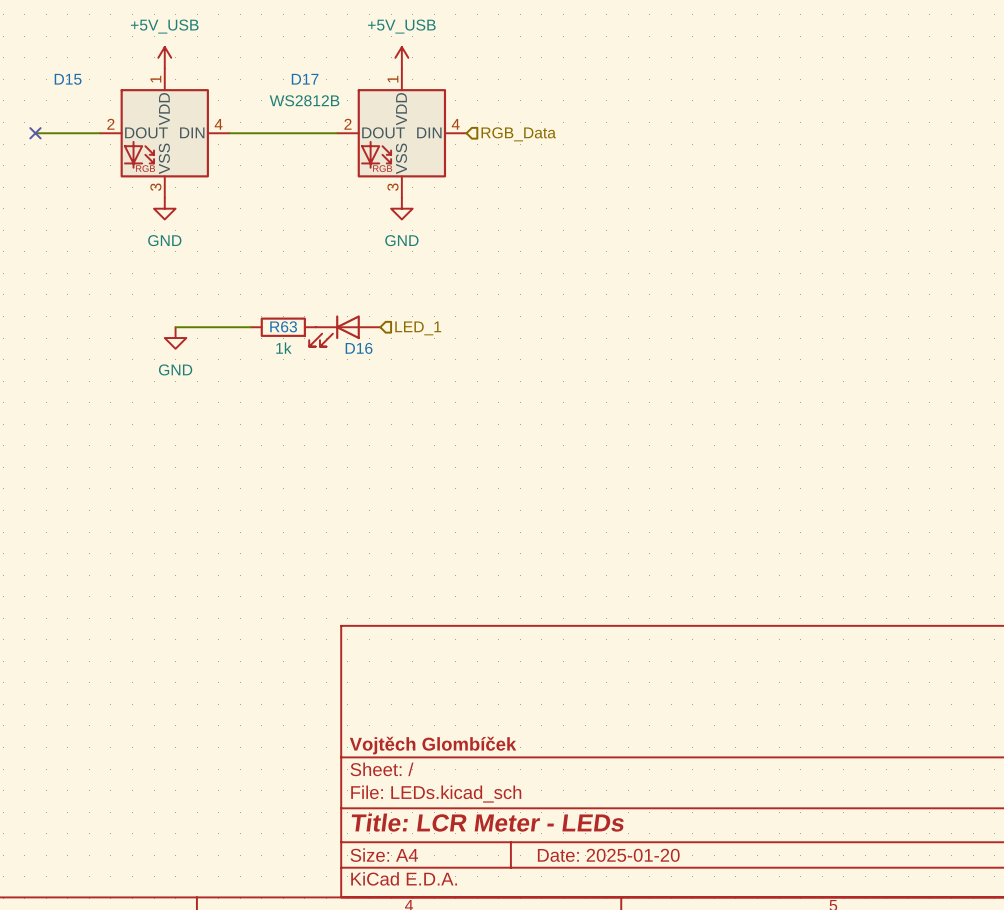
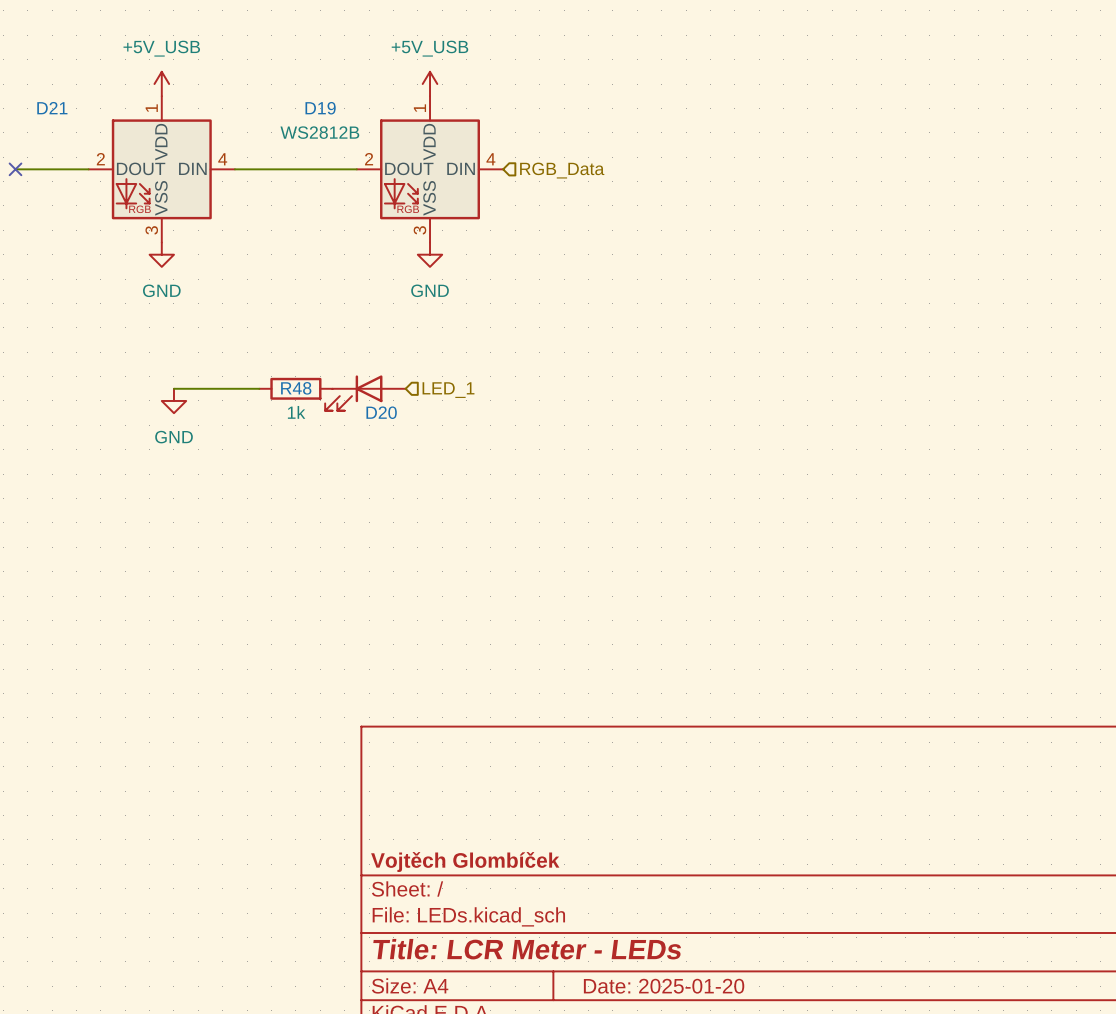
D15 name: D15 (68, 79) -> D21 (52, 108)
D17 name: D17 (305, 79) -> D19 (320, 108)
R63 name: R63 (283, 326) -> R48 (296, 388)
D16 name: D16 (359, 348) -> D20 (381, 412)

